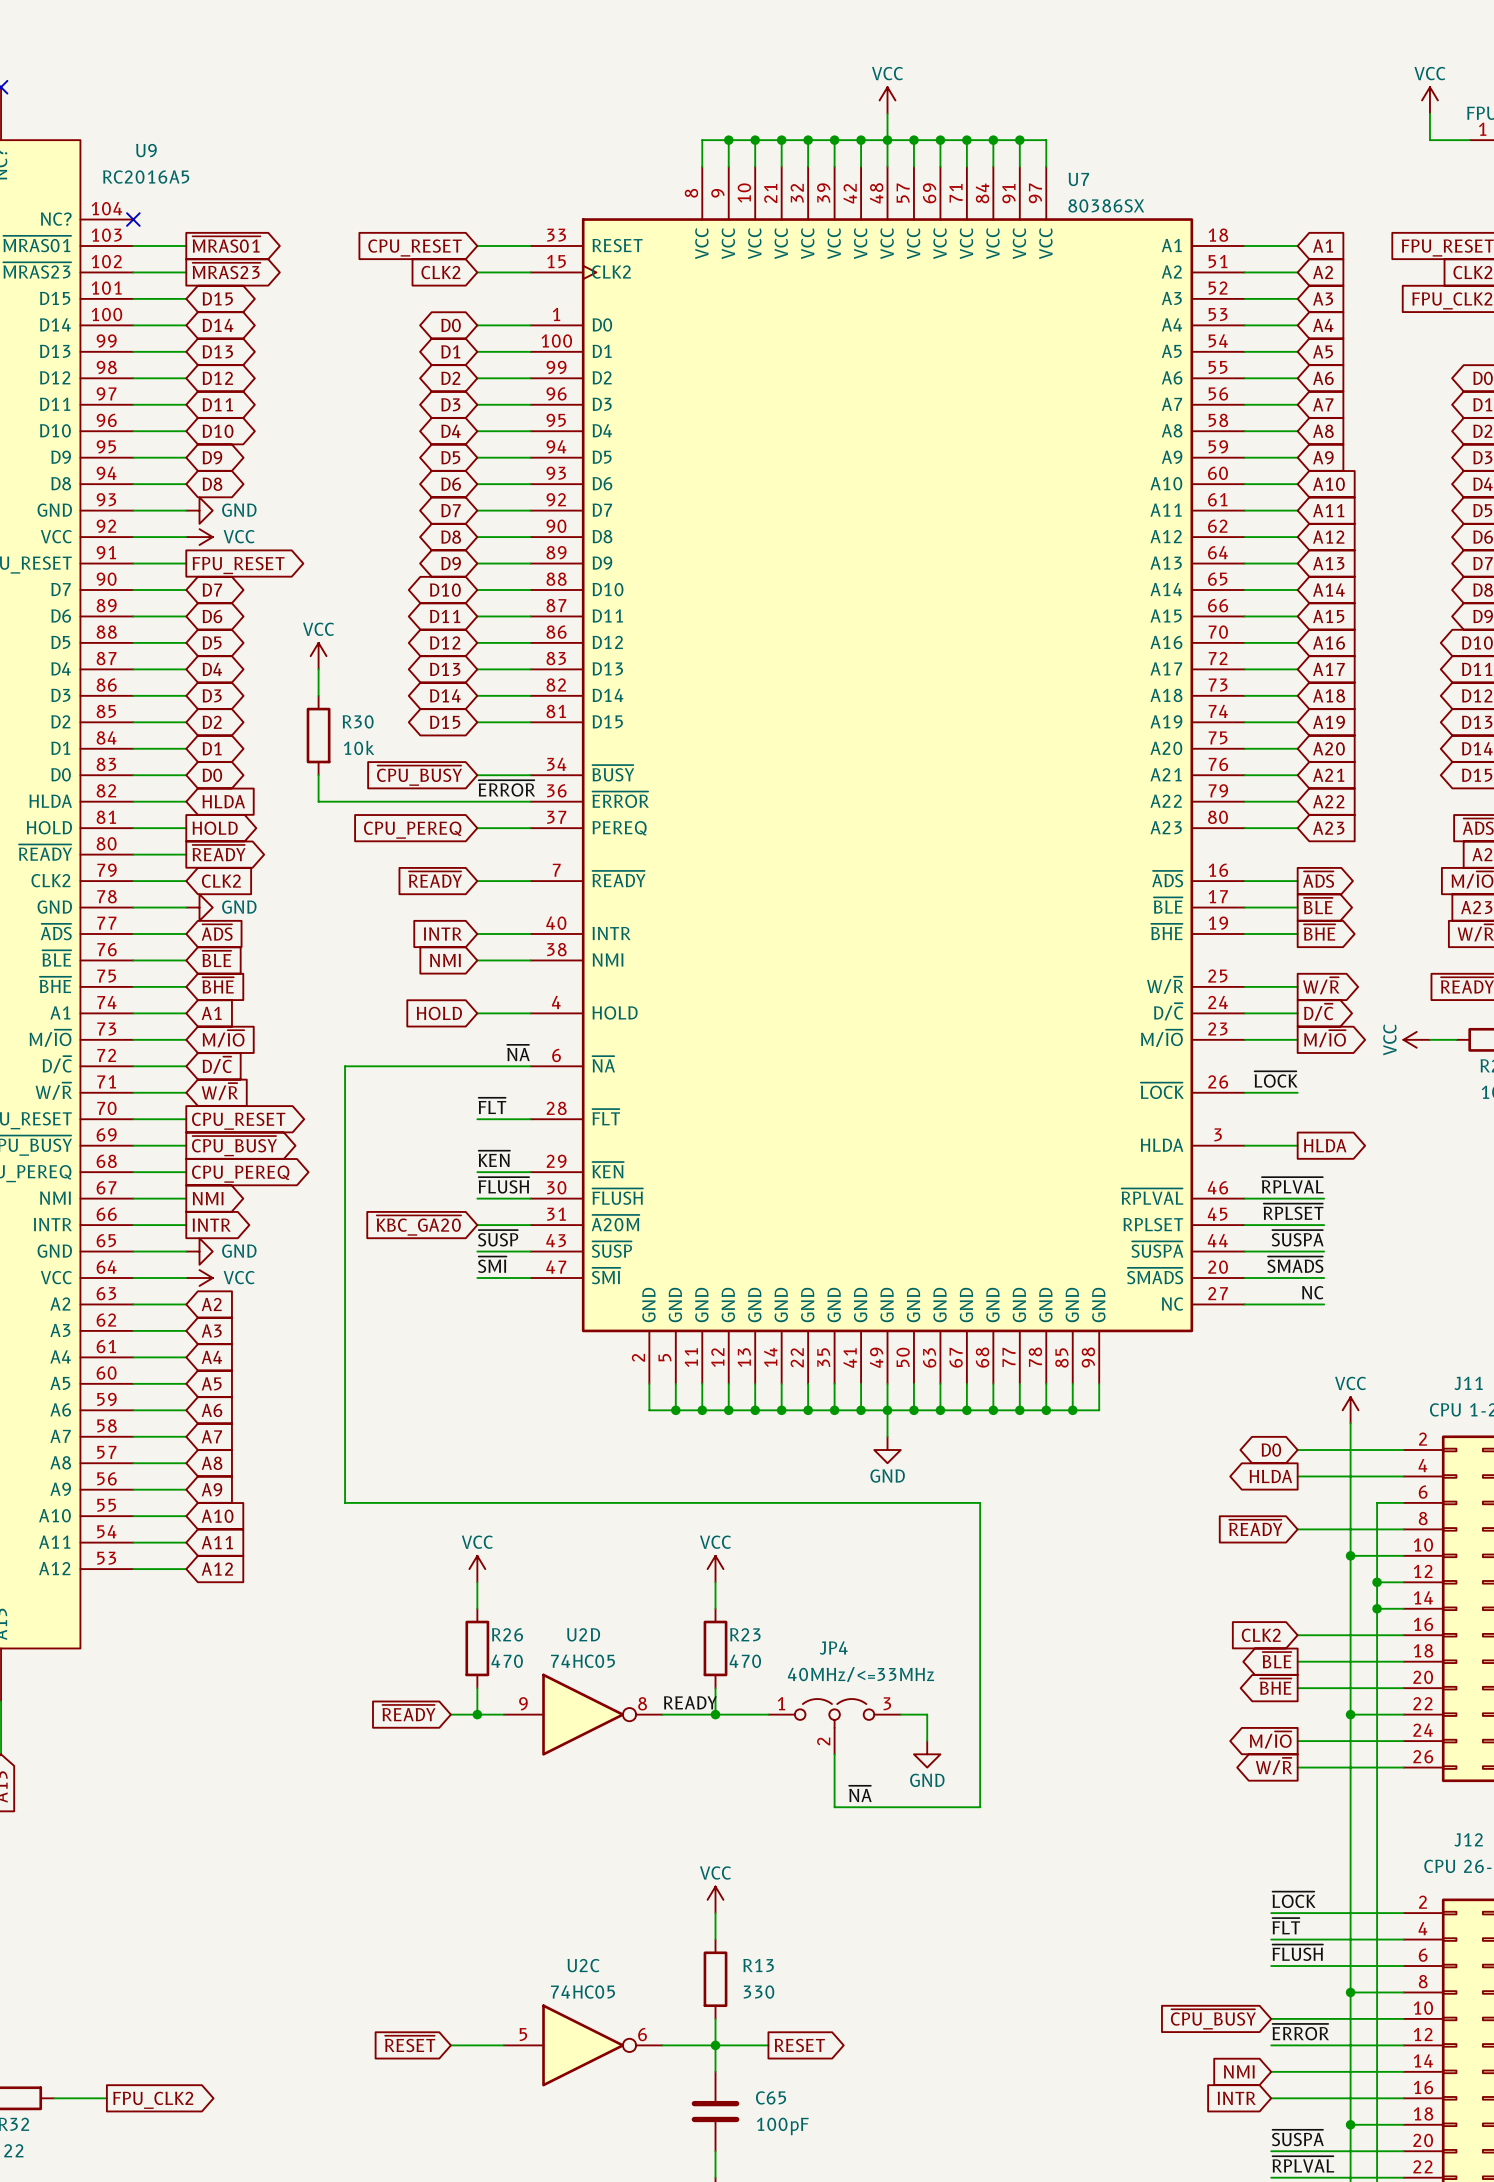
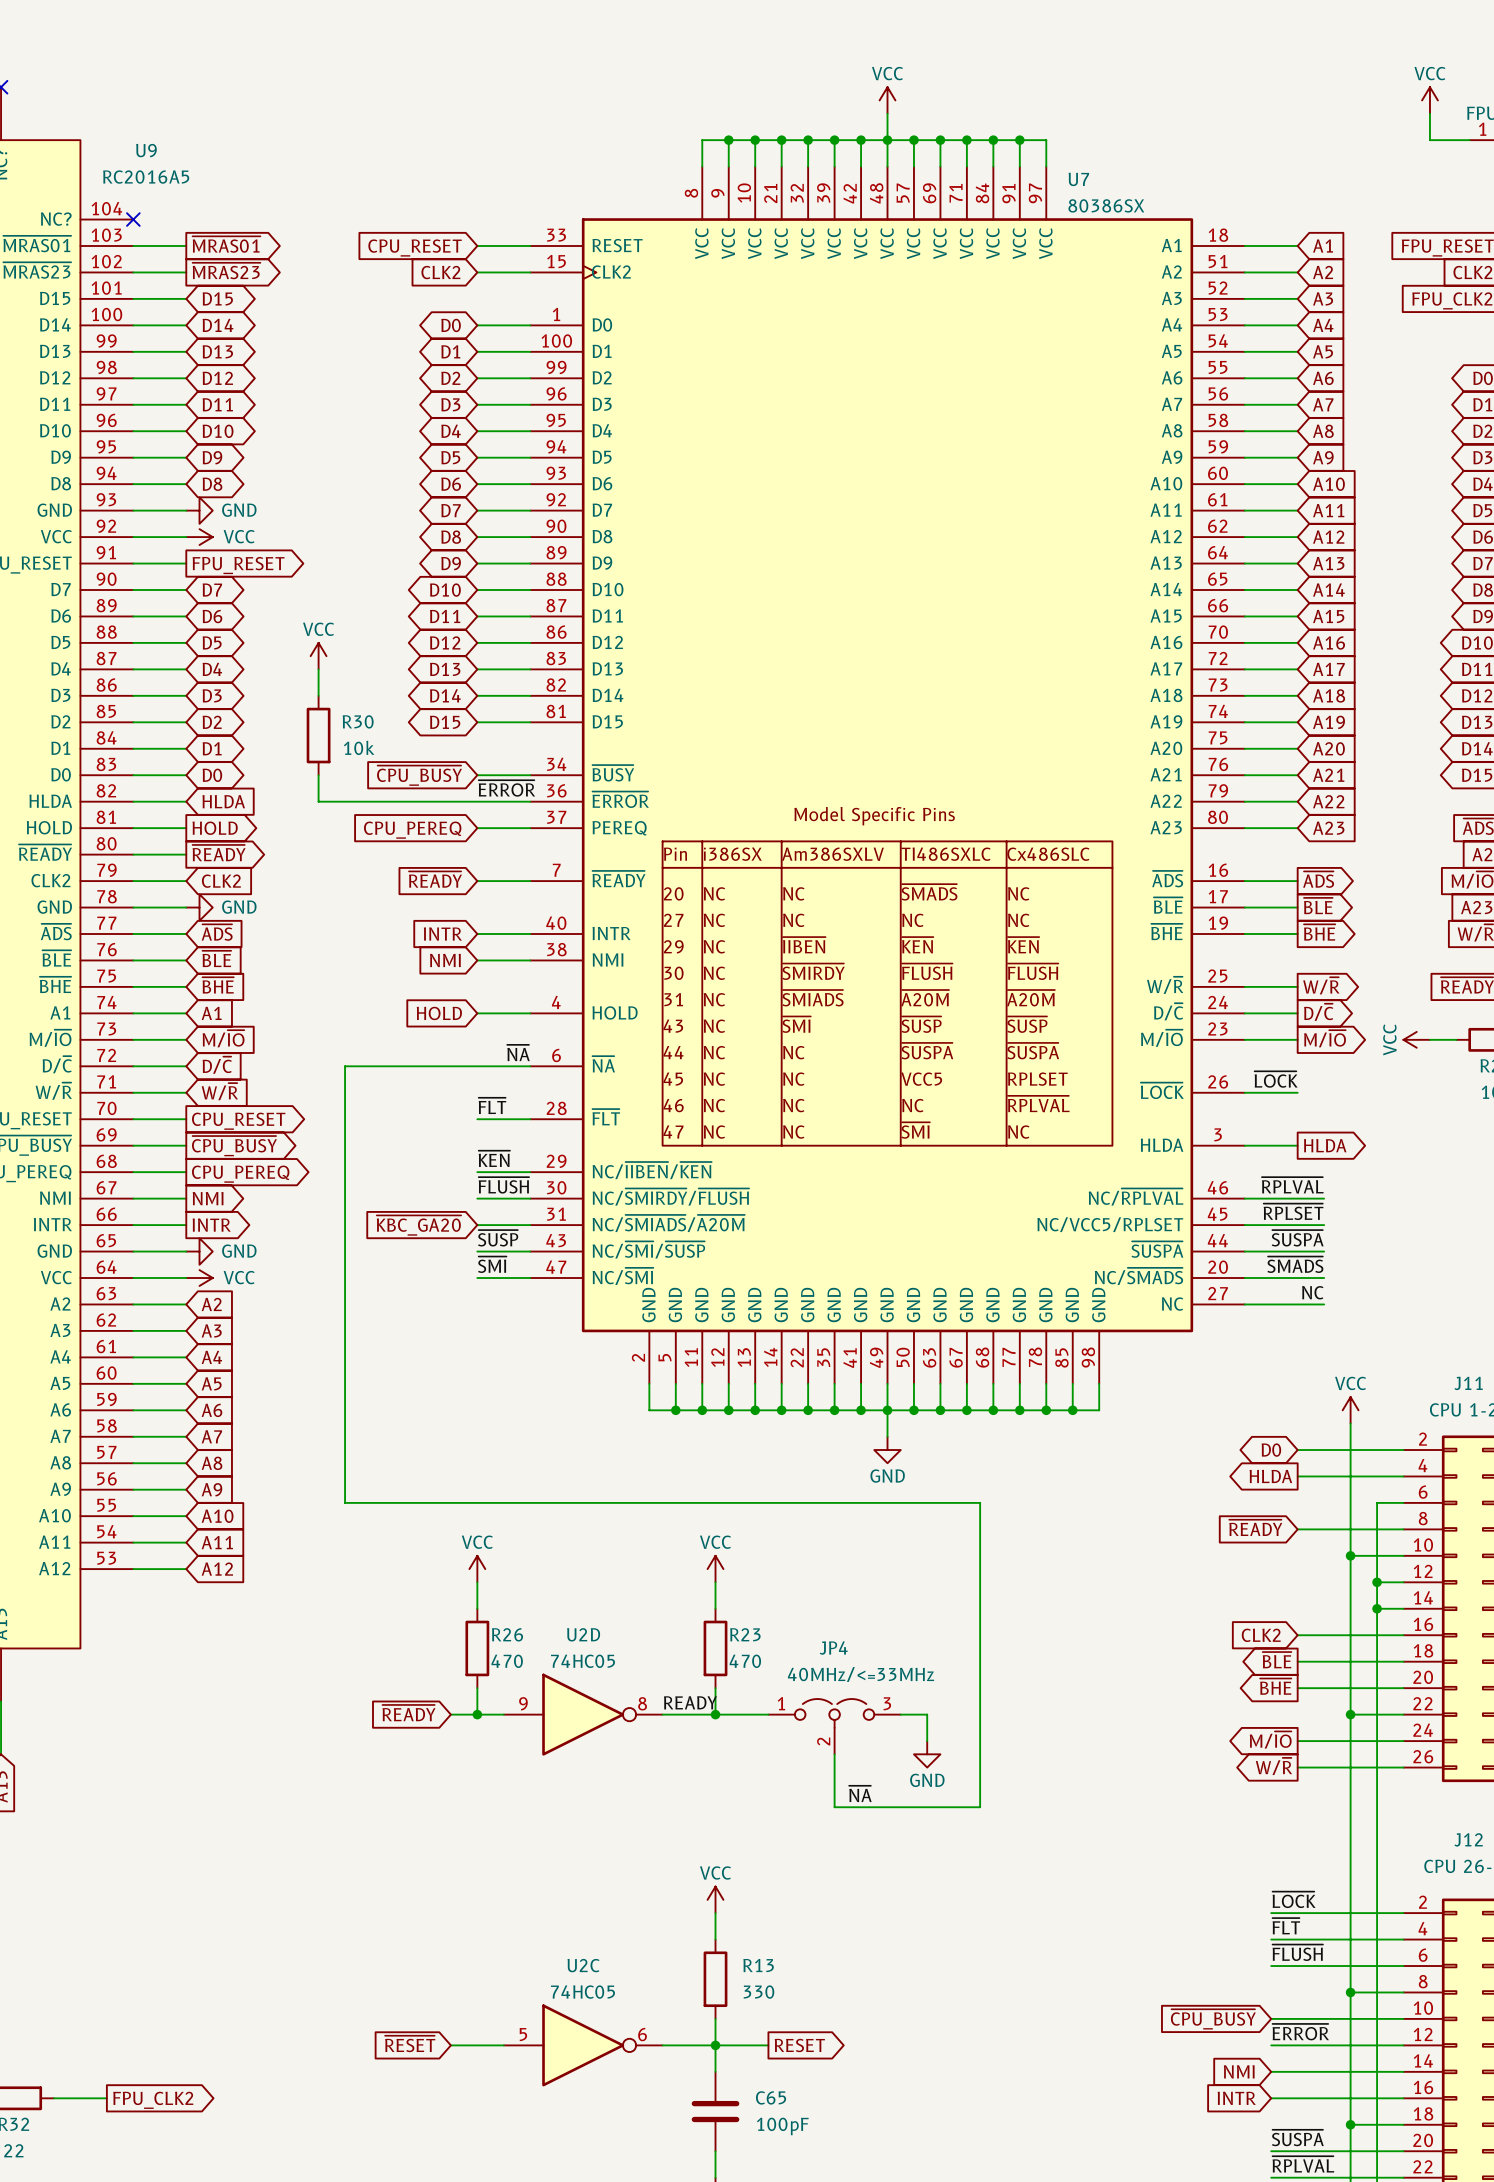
U7 symbol: [530, 166, 1245, 1384] -> [530, 166, 1245, 1384]

